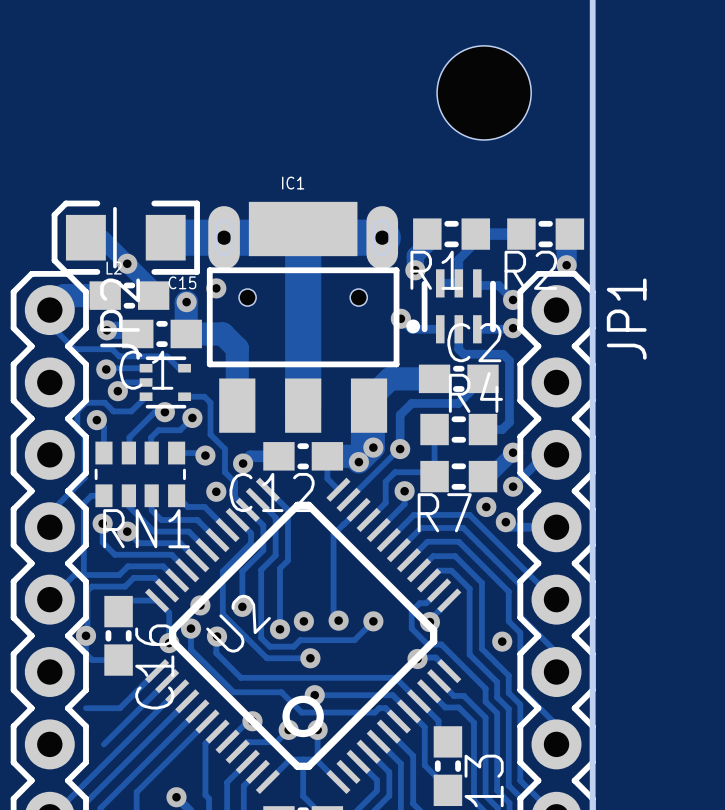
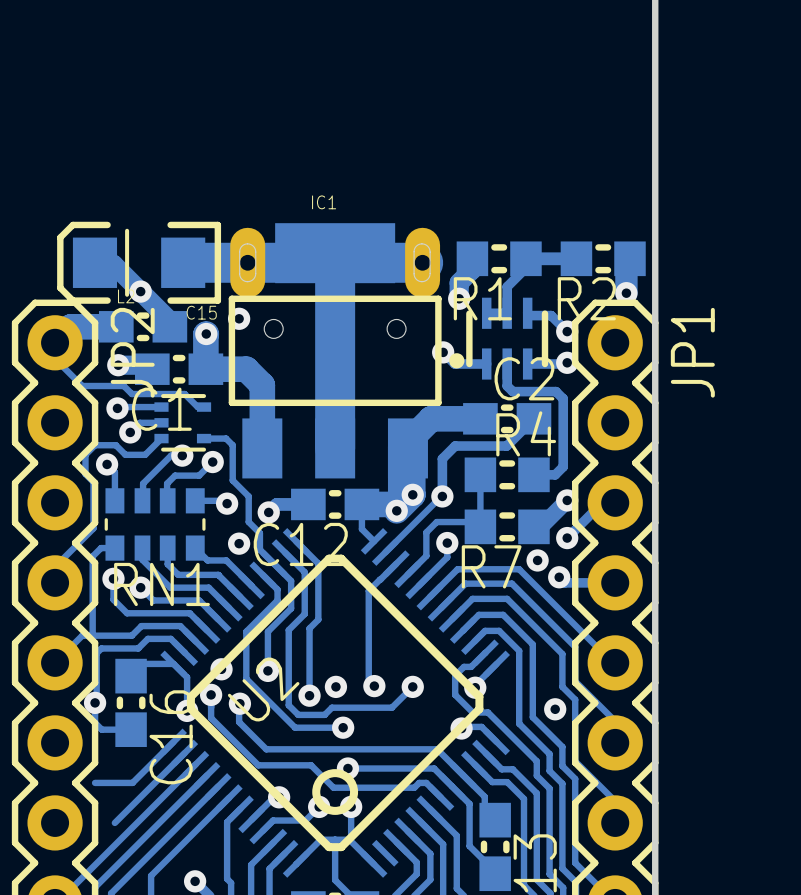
part: (484, 92) -> none

